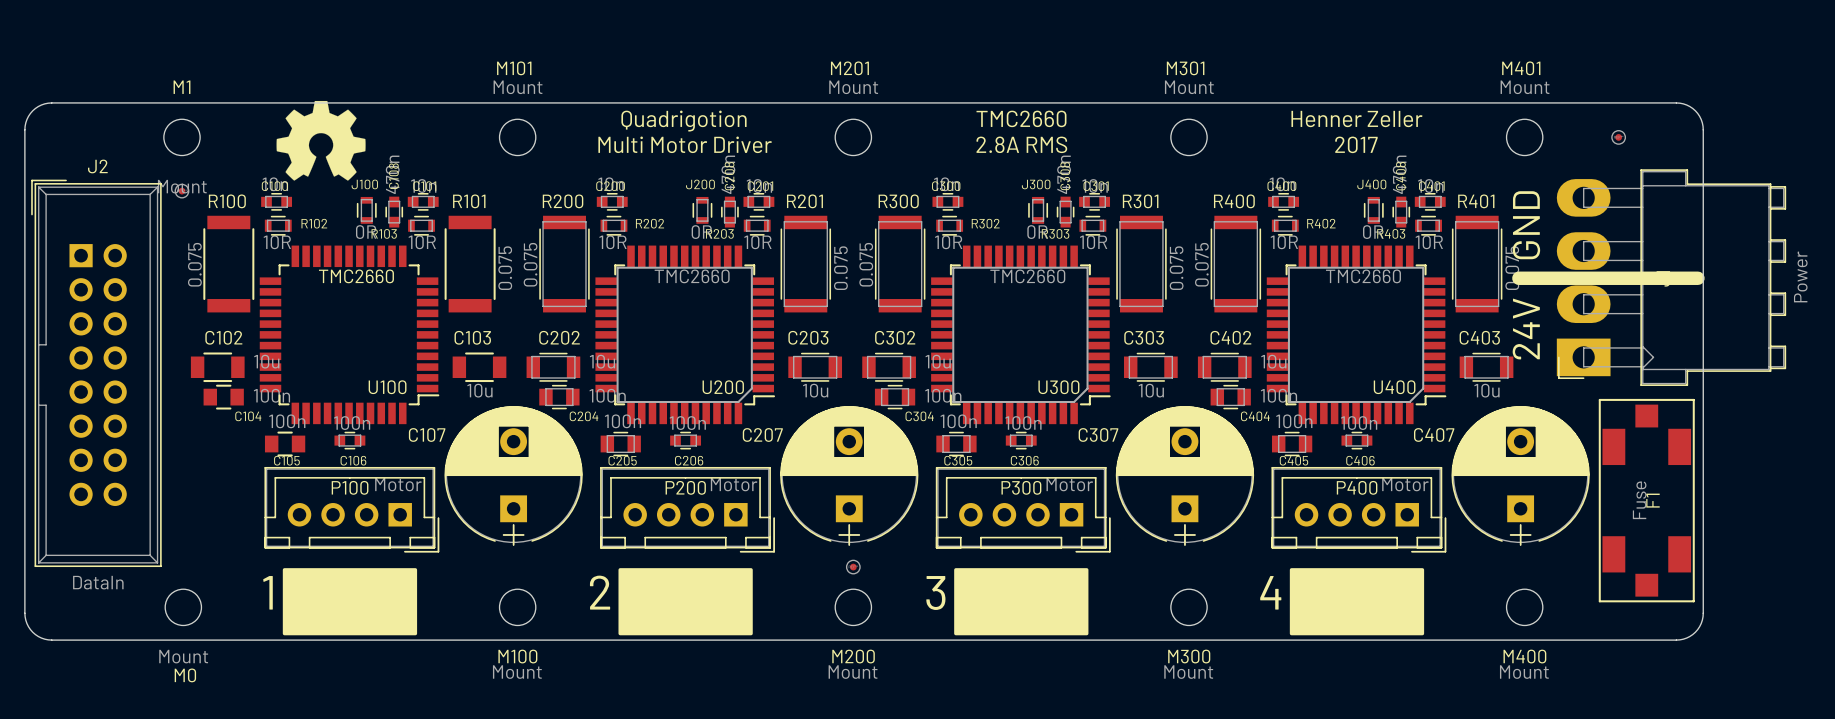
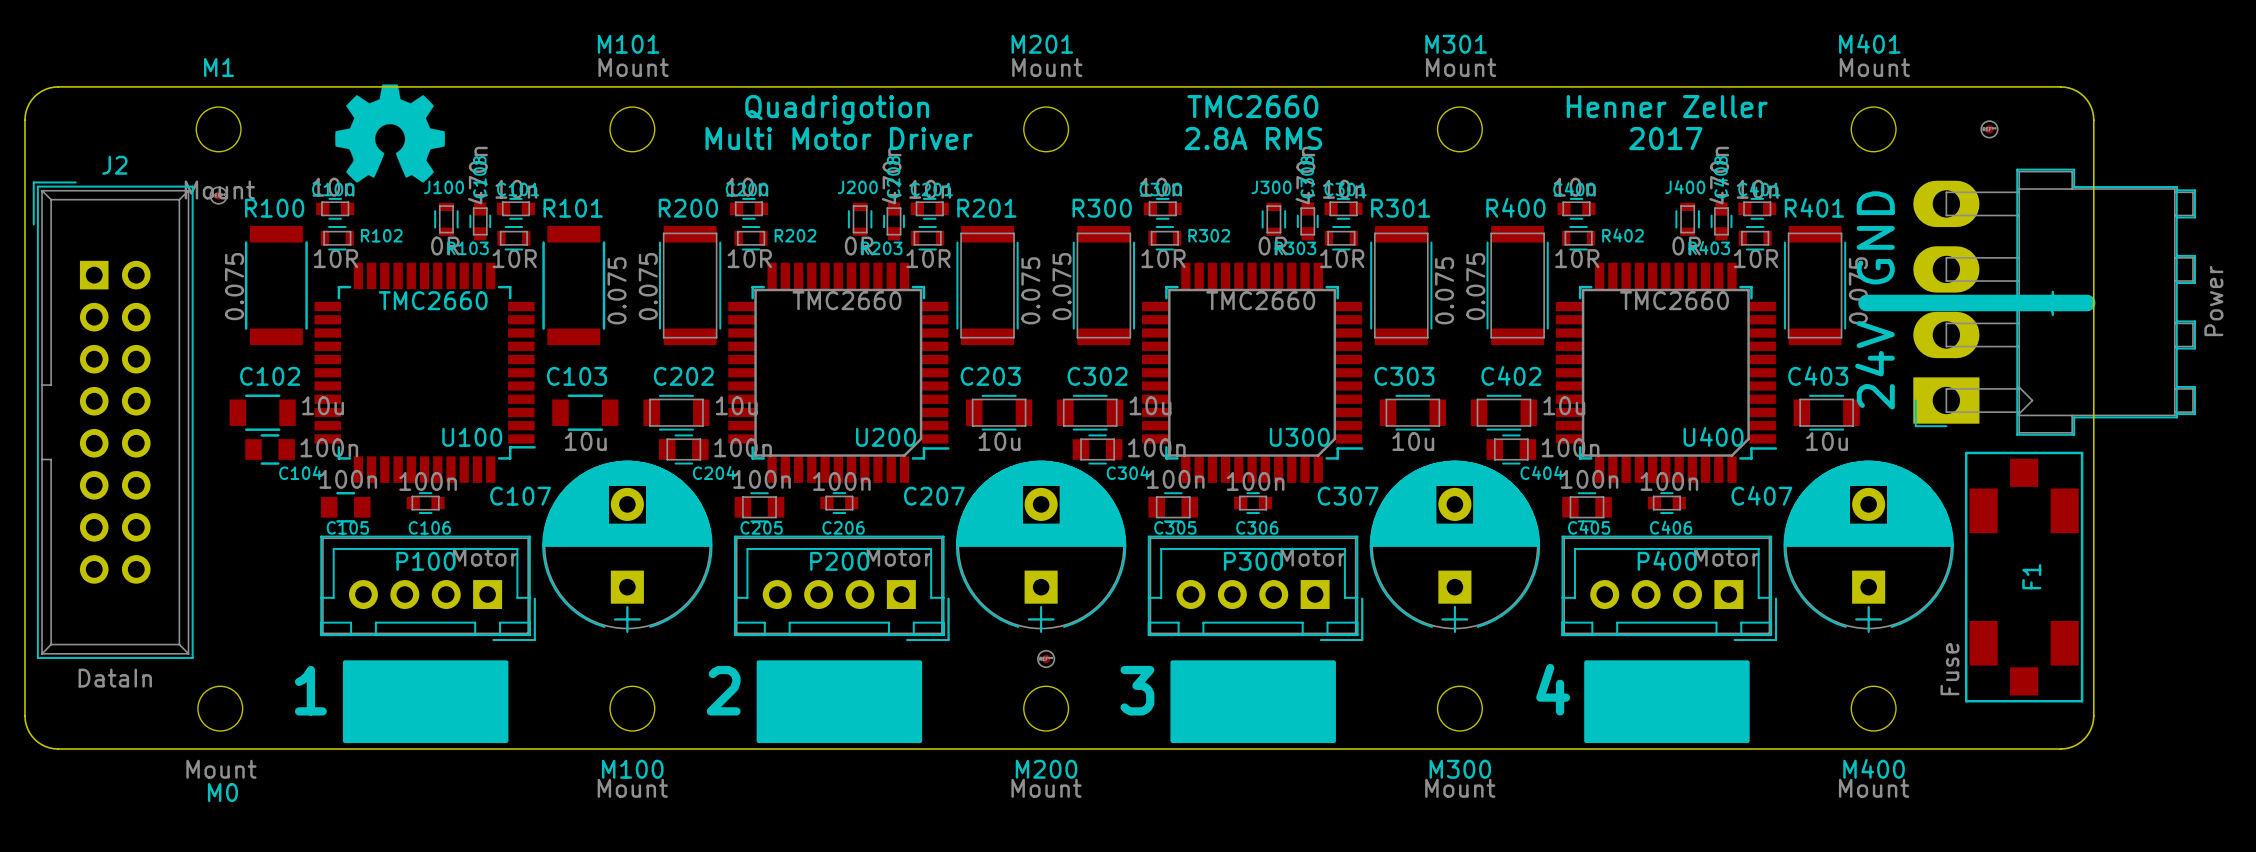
F1 value position: Fuse (1639, 500) -> Fuse (1949, 669)

